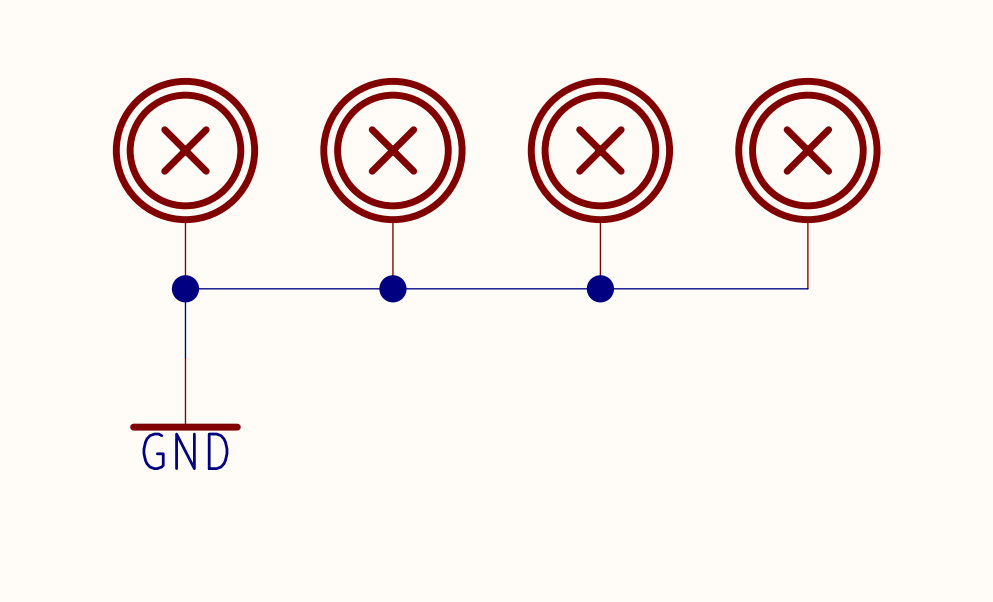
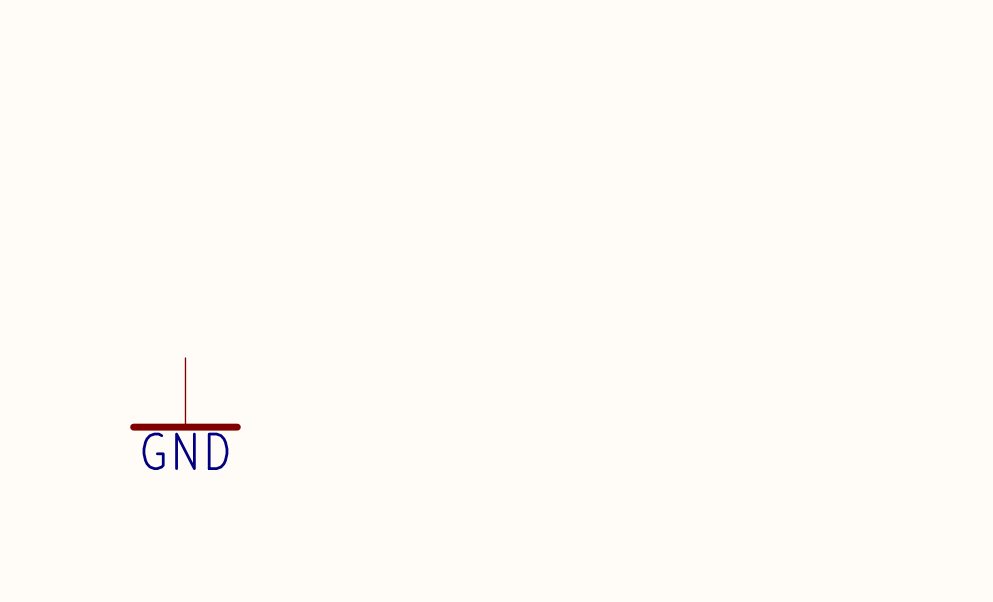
part: (185, 183) -> none
part: (392, 183) -> none
part: (600, 183) -> none
part: (807, 183) -> none
junction: (185, 288) -> none
junction: (392, 288) -> none
junction: (600, 288) -> none
wire: (807, 288) (185, 288) (185, 357) -> none

